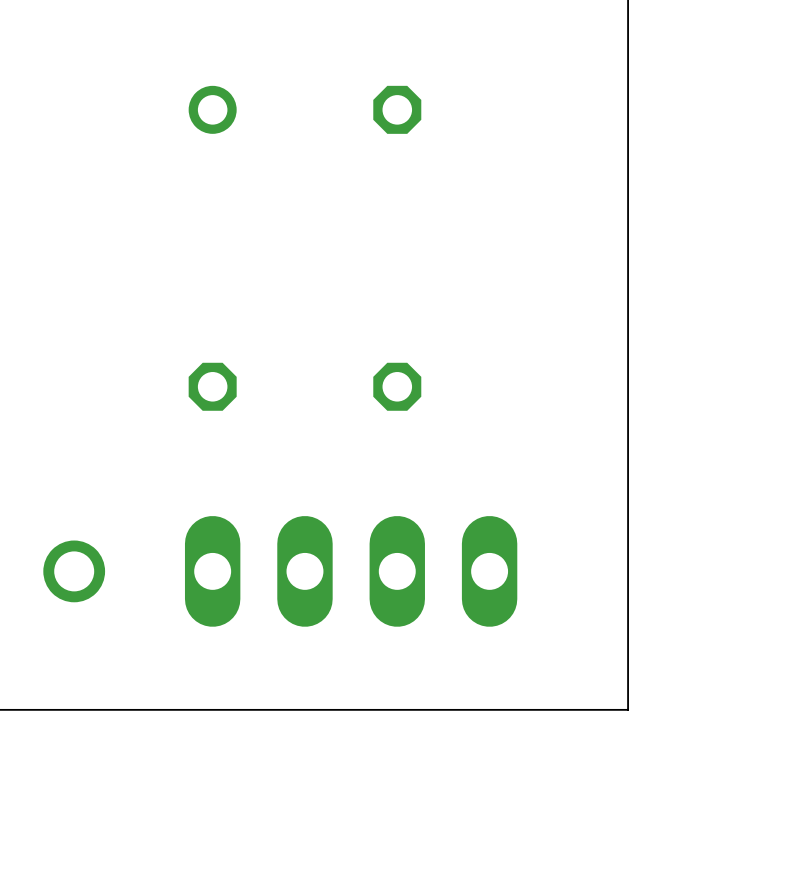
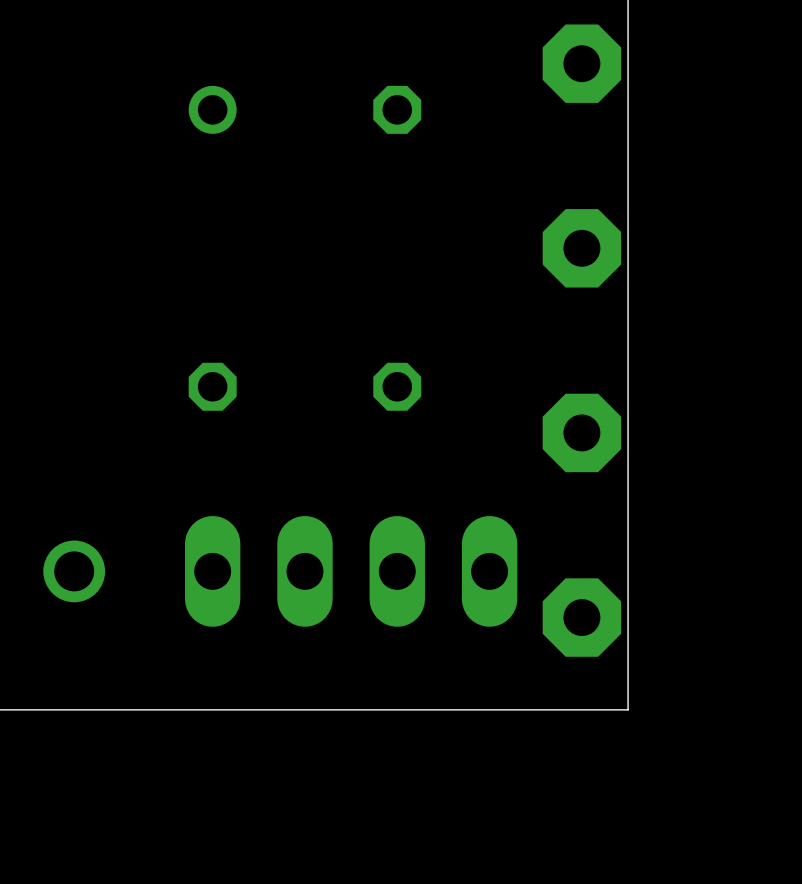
part: none -> (581, 63)
part: none -> (581, 248)
part: none -> (581, 432)
part: none -> (581, 617)

